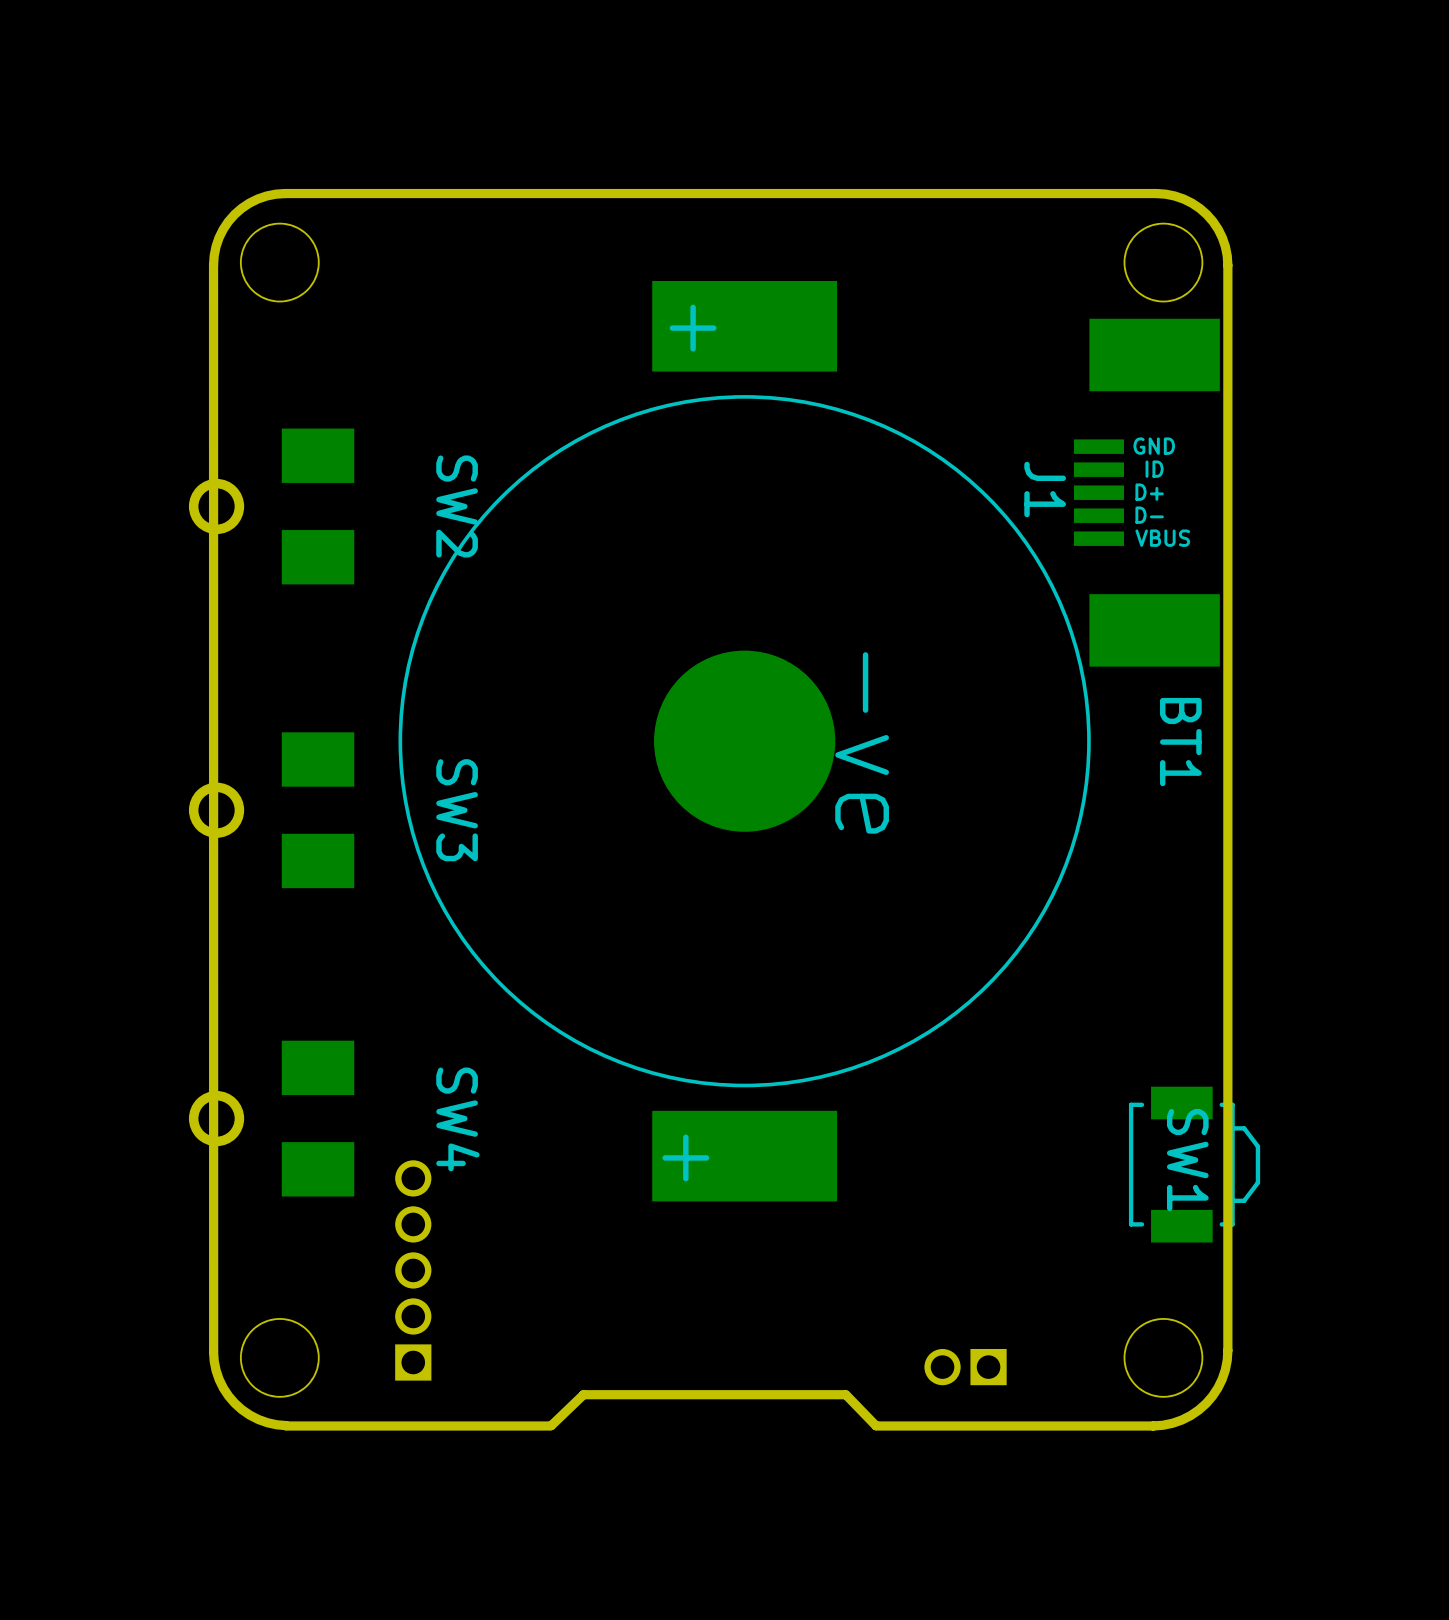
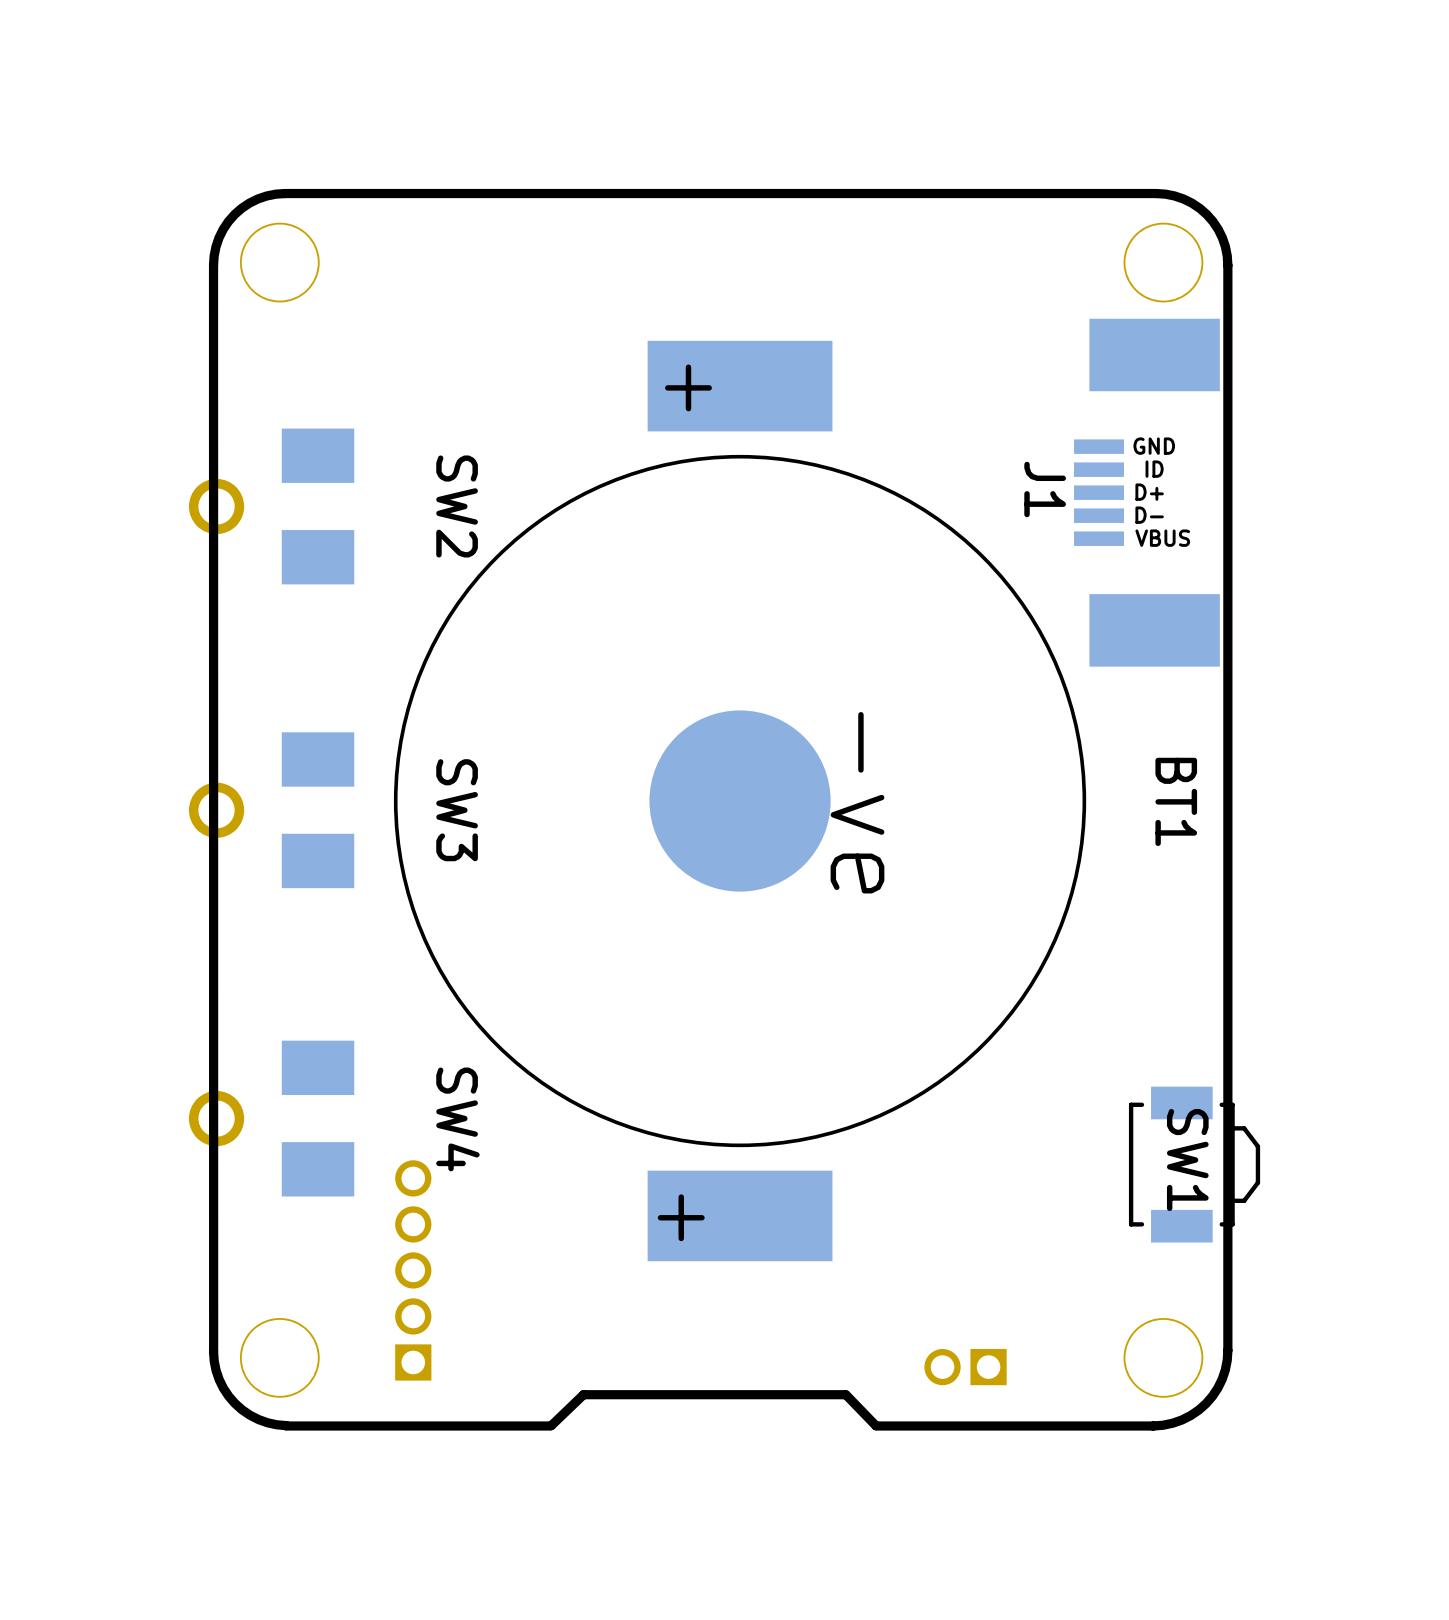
BT1 position: (744, 741) -> (740, 801)

